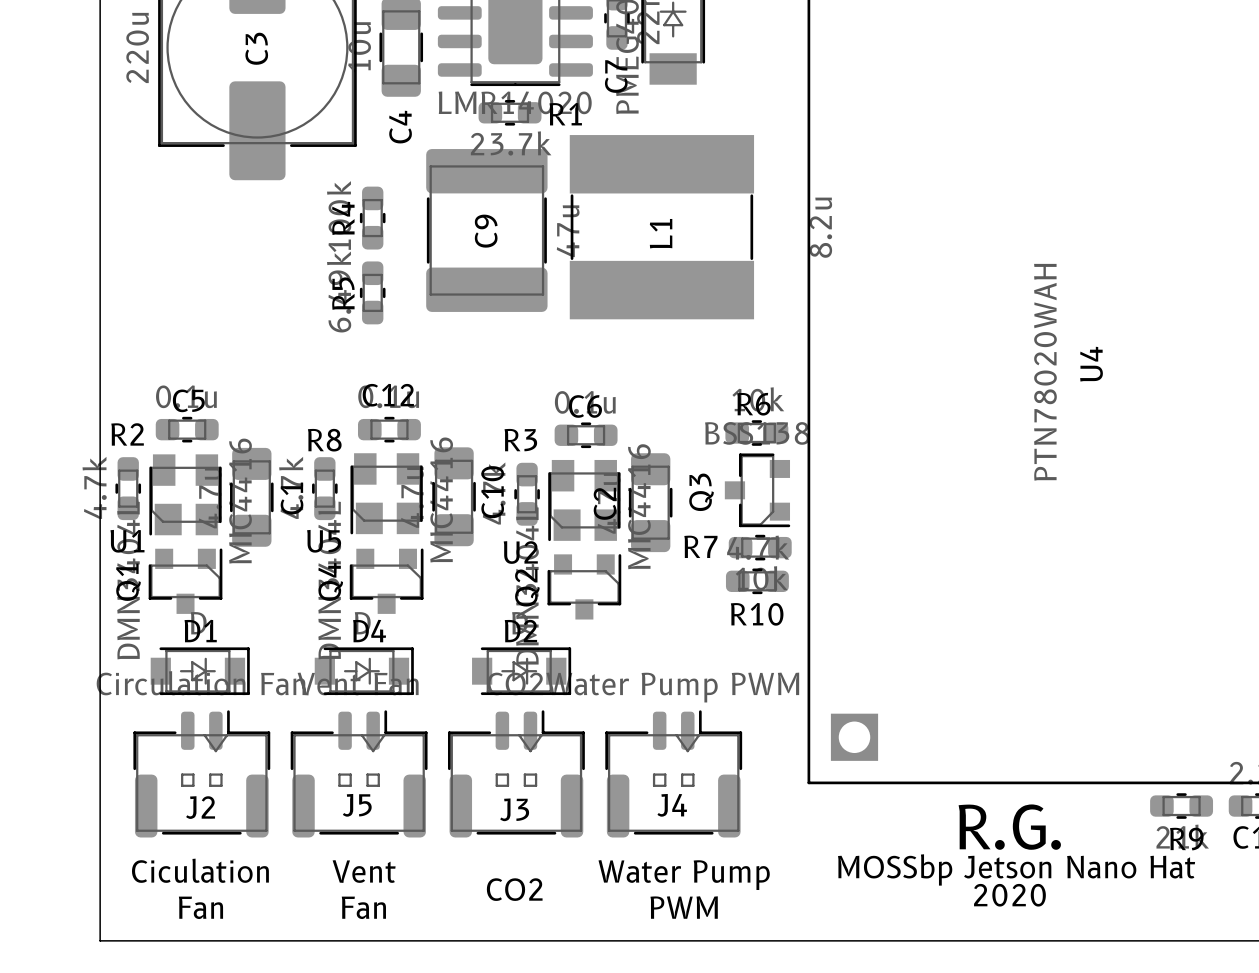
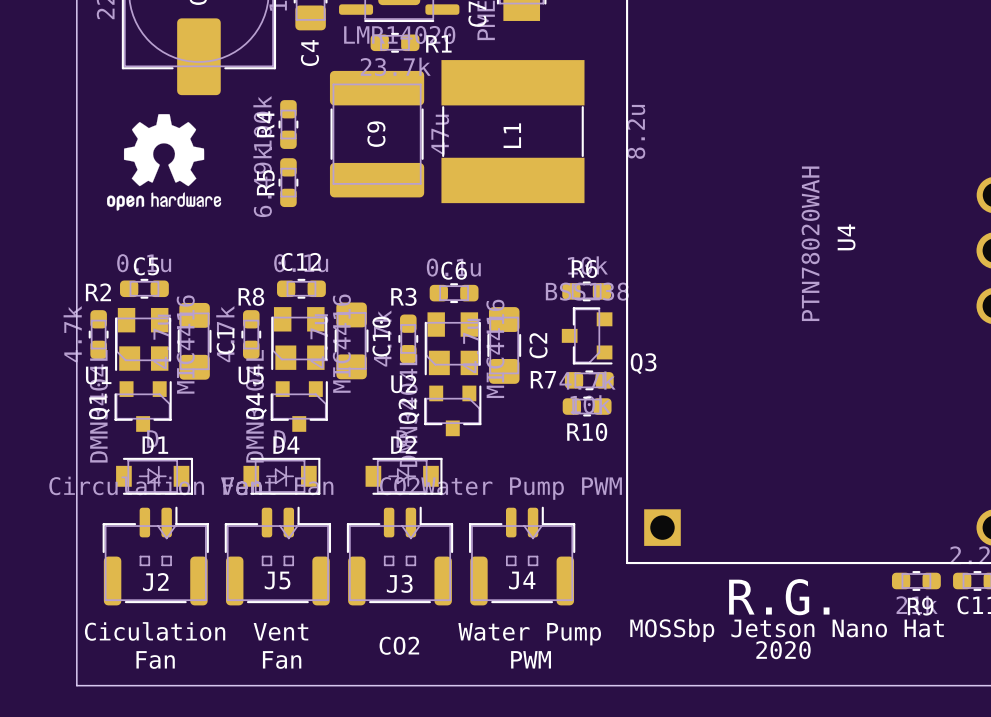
drawing: none -> [106, 114, 222, 211]
Q3 name rotation: 0° (701, 492) -> 90° clockwise (643, 363)
Q3 name position: Q3 (701, 492) -> Q3 (643, 363)
C2 name position: C2 (605, 503) -> C2 (538, 345)

